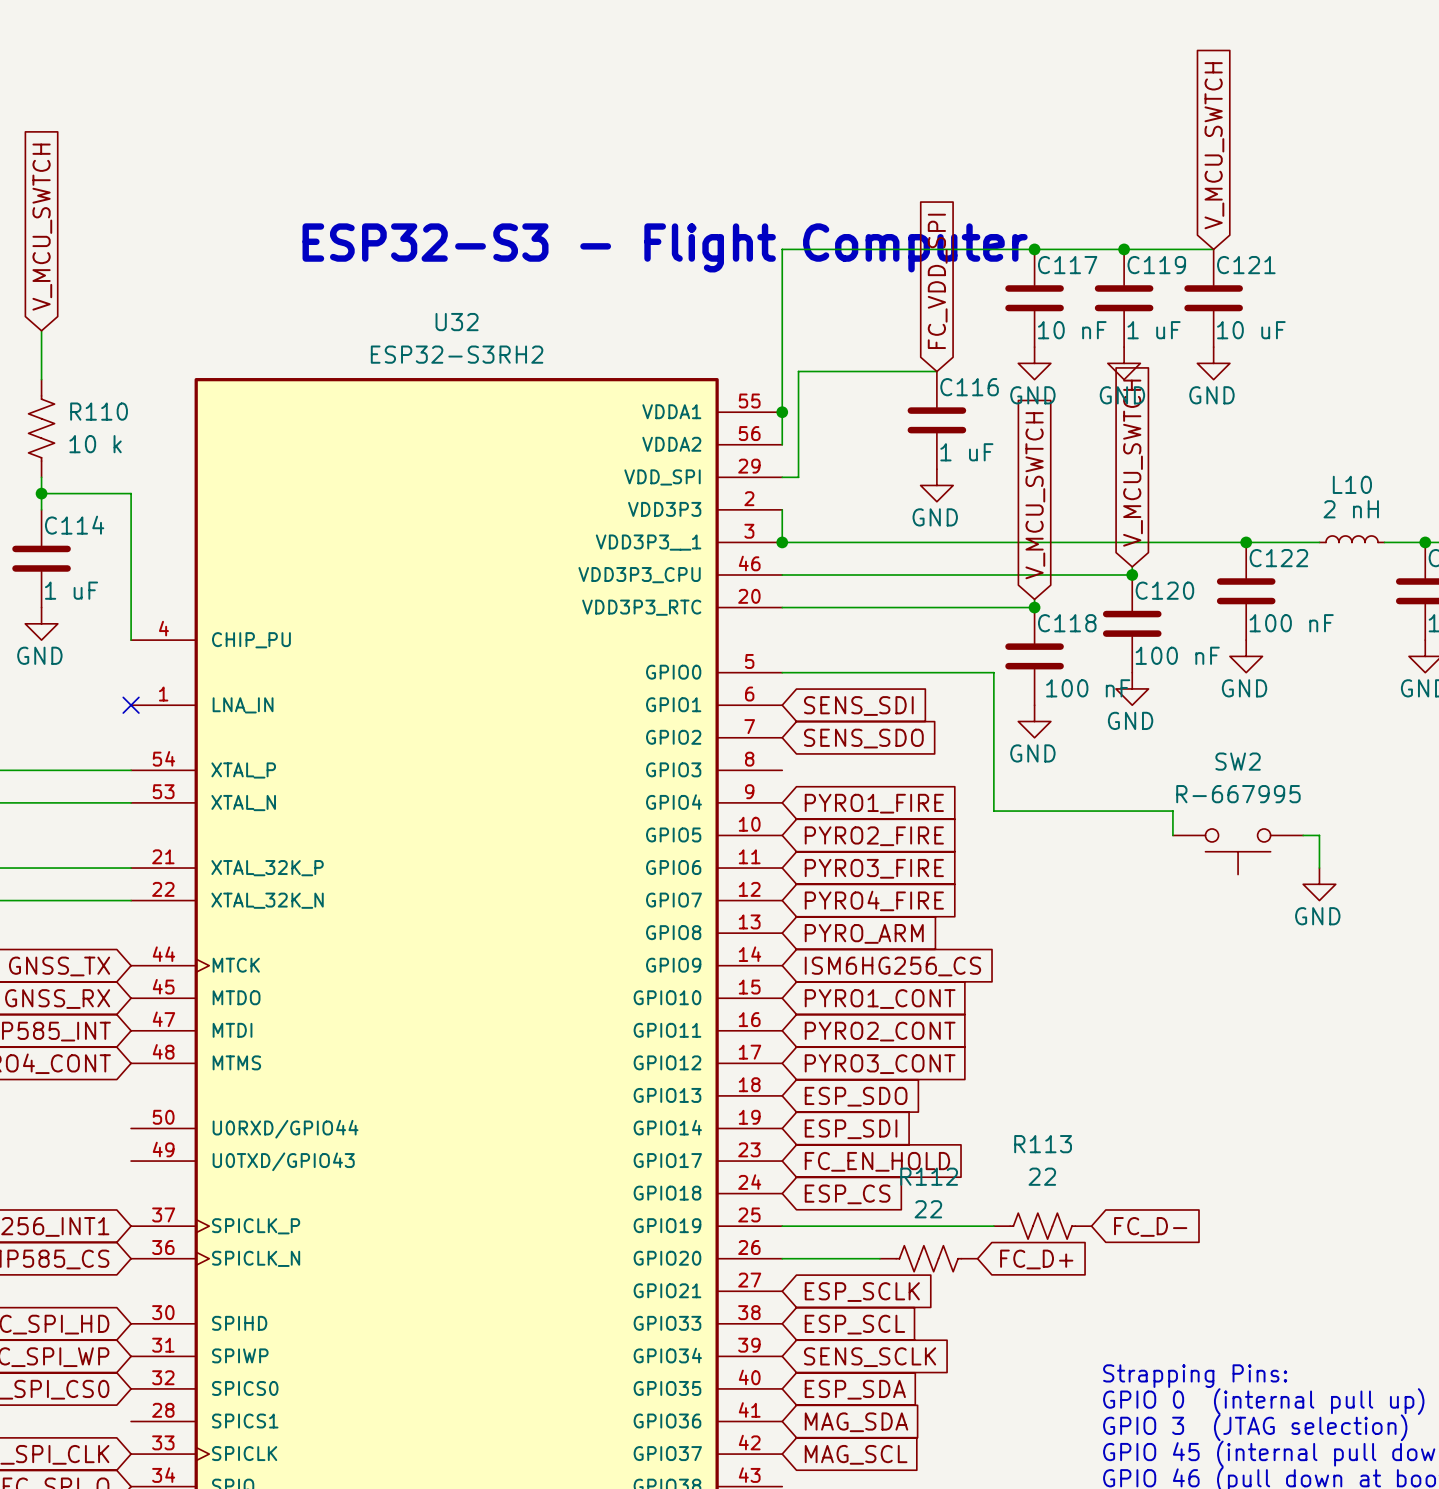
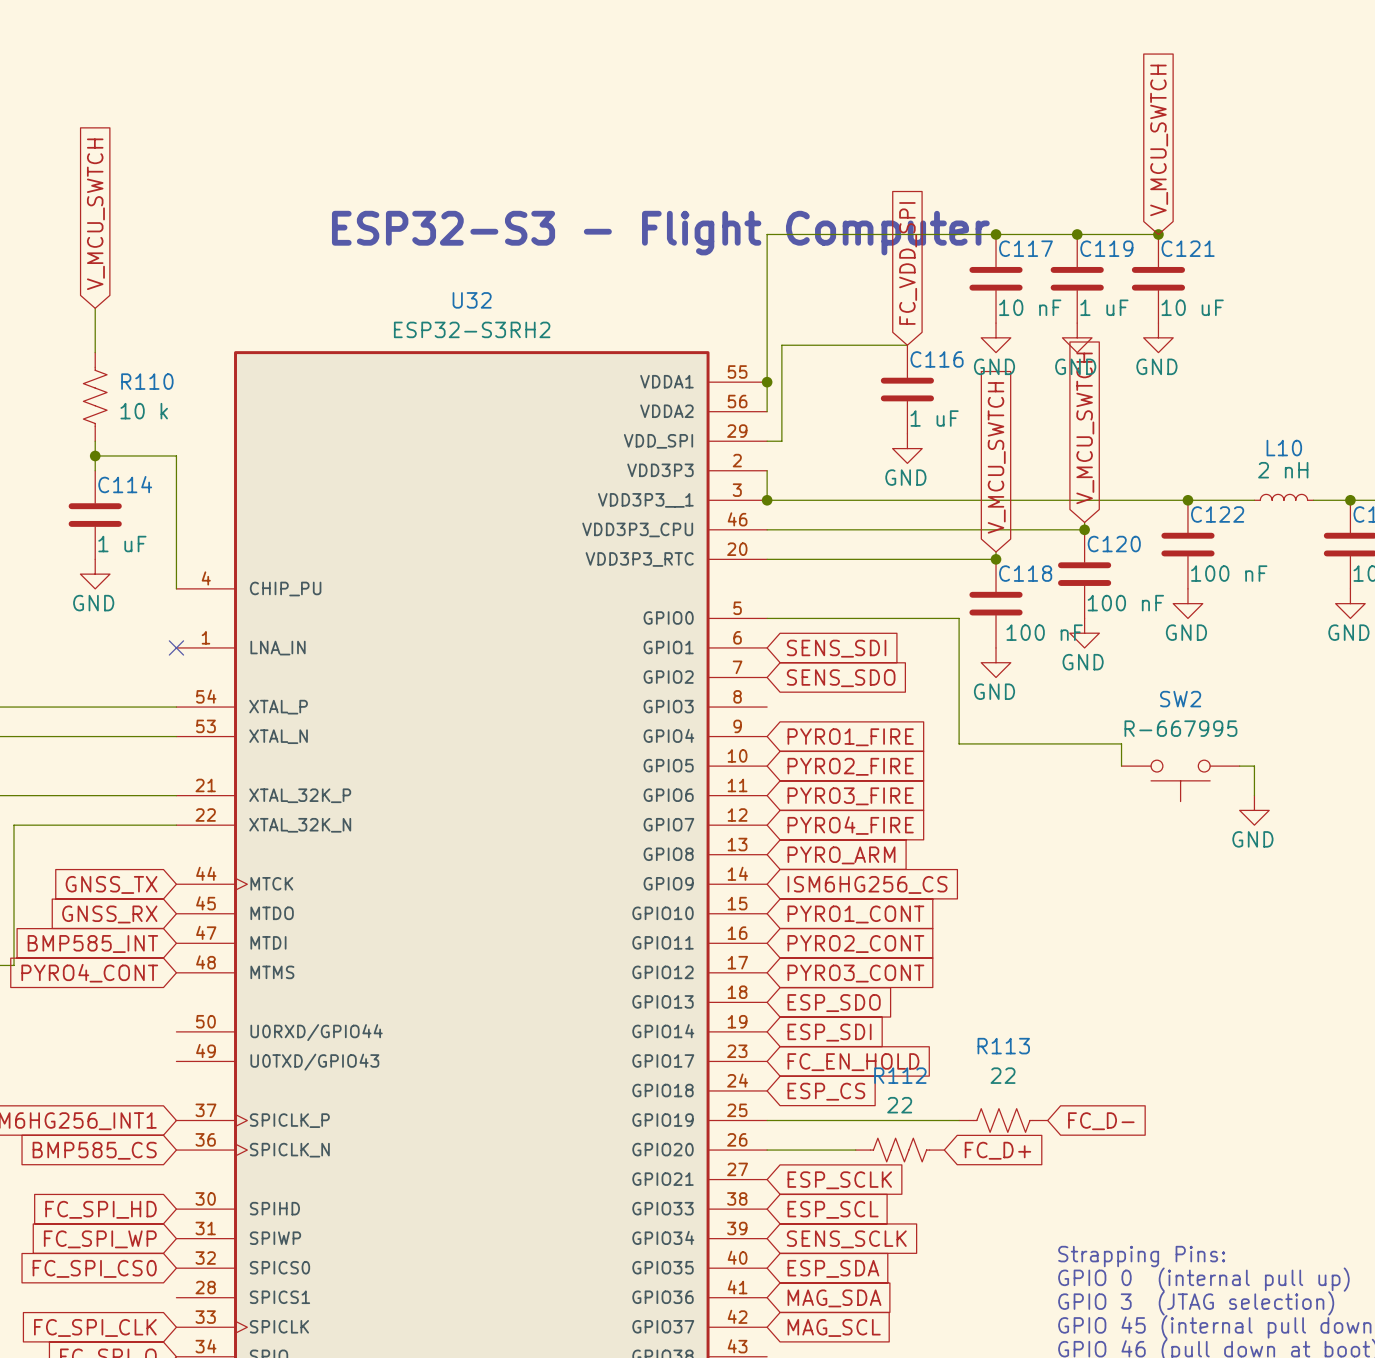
junction: none -> (1158, 234)

